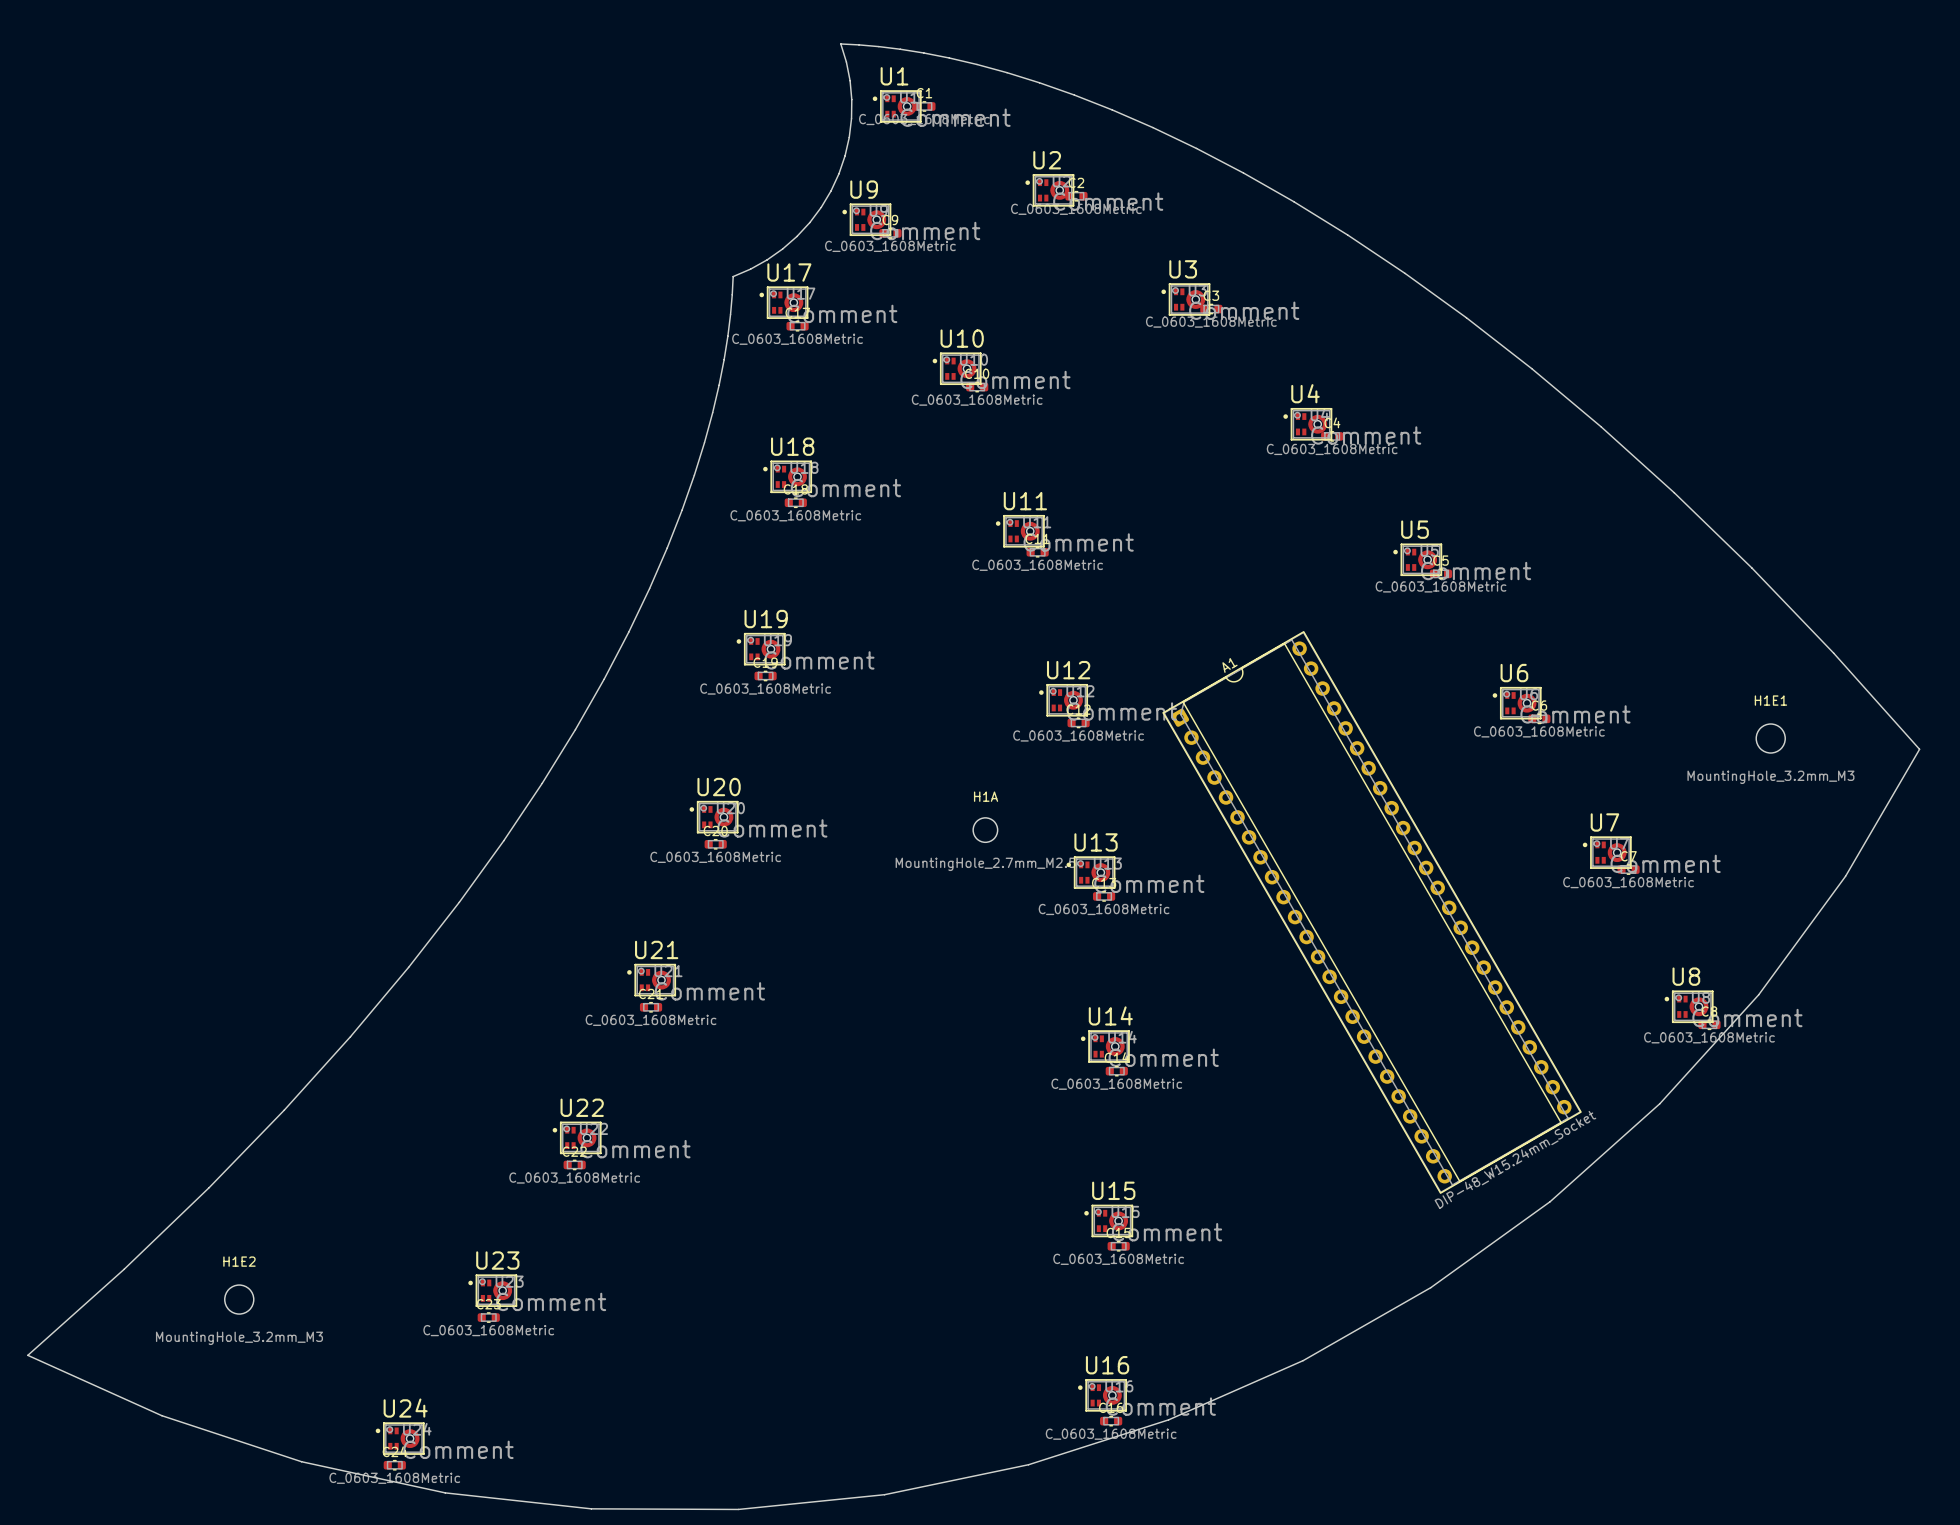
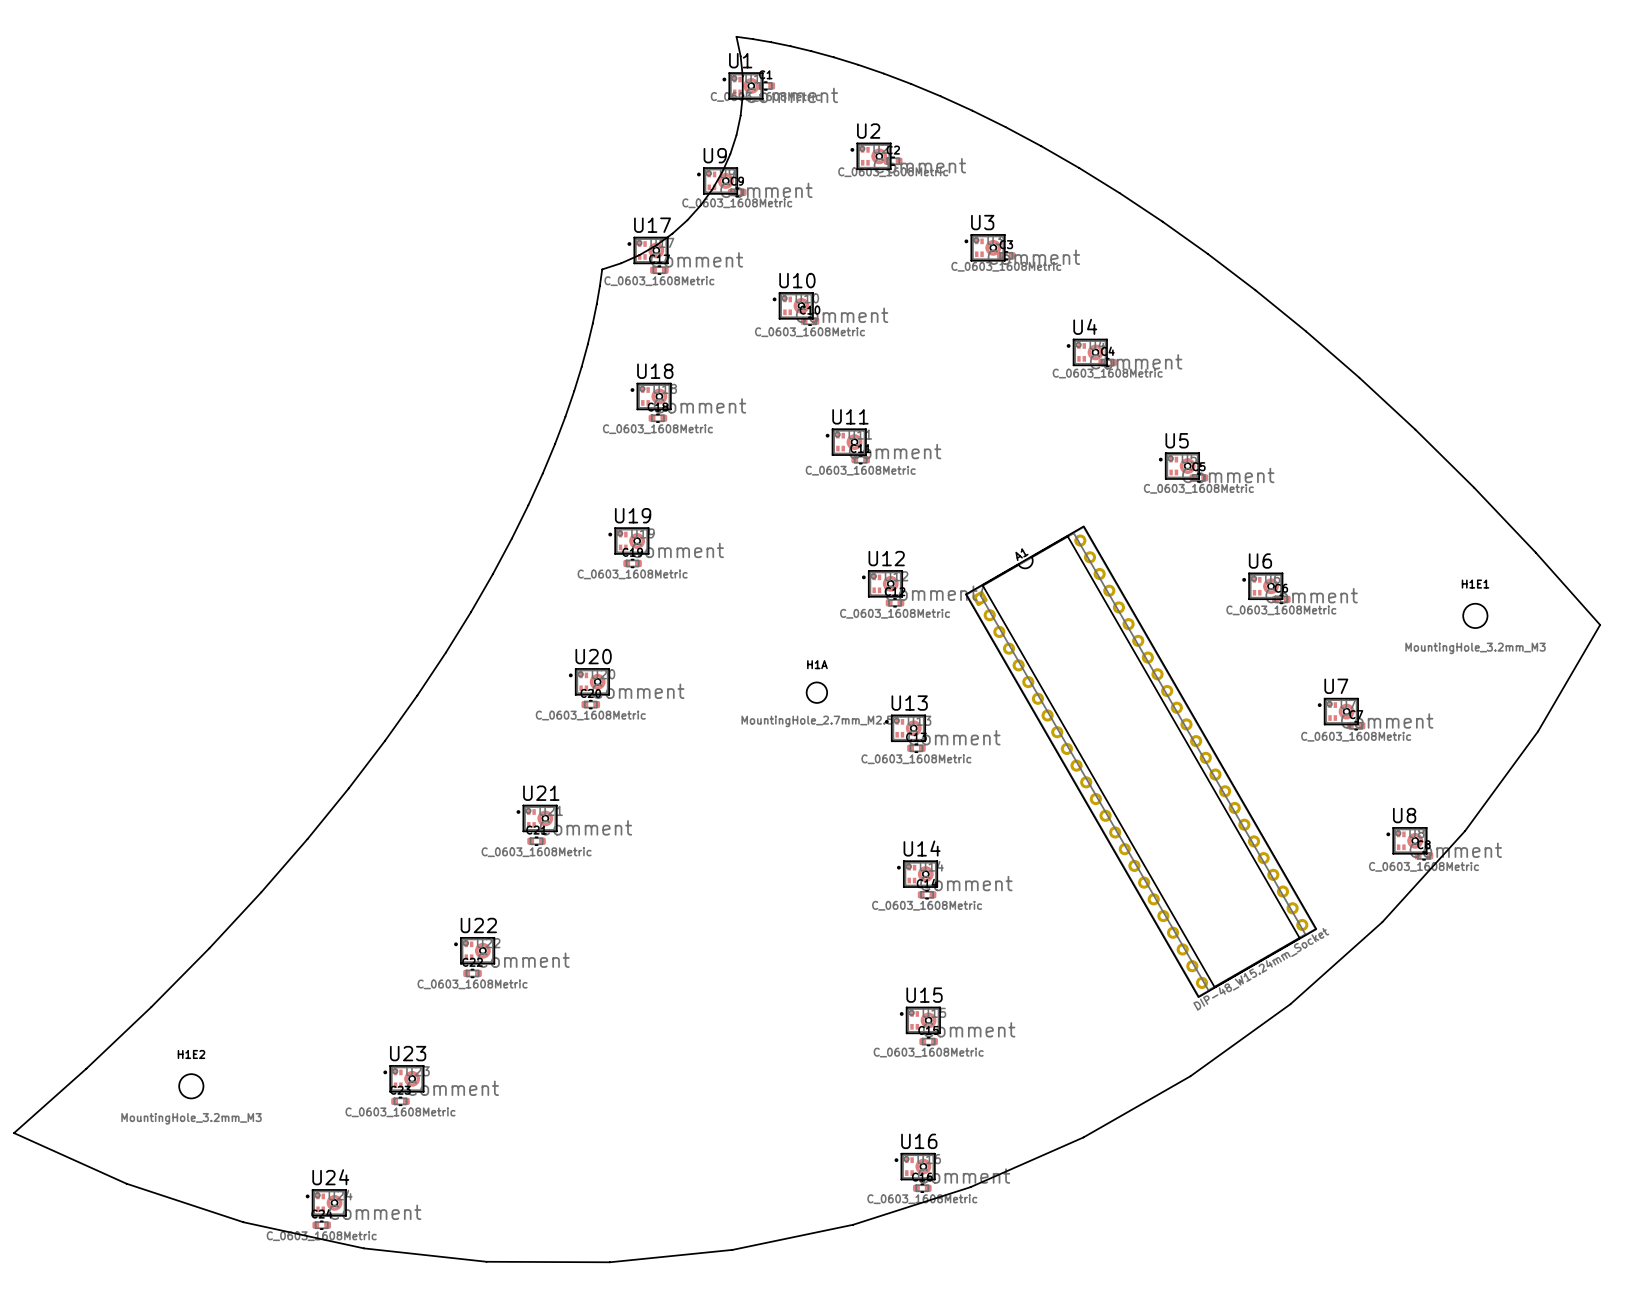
board edge: (1919, 749) (1833, 653) (1751, 567) (1674, 492) (1600, 426) (1531, 368) (1466, 317) (1347, 234) (1293, 201) (1196, 148) (1152, 127) (1074, 95) (1006, 72) (949, 58) (900, 49) (840, 43) (850, 80) (851, 99) (849, 137) (838, 173) (821, 207) (796, 236) (767, 259) (733, 276) (727, 336) (719, 385) (704, 442) (682, 510) (649, 588) (628, 632) (575, 729) (542, 783) (459, 902) (408, 967) (350, 1036) (284, 1110) (209, 1187) (124, 1269) (27, 1355) -> (1600, 624) (1474, 487) (1359, 377) (1255, 290) (1162, 221) (1119, 193) (1041, 146) (940, 96) (883, 73) (834, 57) (790, 46) (736, 36) (740, 56) (742, 95) (736, 135) (722, 172) (700, 205) (672, 233) (639, 255) (602, 269) (587, 344) (574, 390) (554, 444) (511, 538) (445, 652) (385, 740) (348, 788) (261, 892) (151, 1007) (14, 1133)

